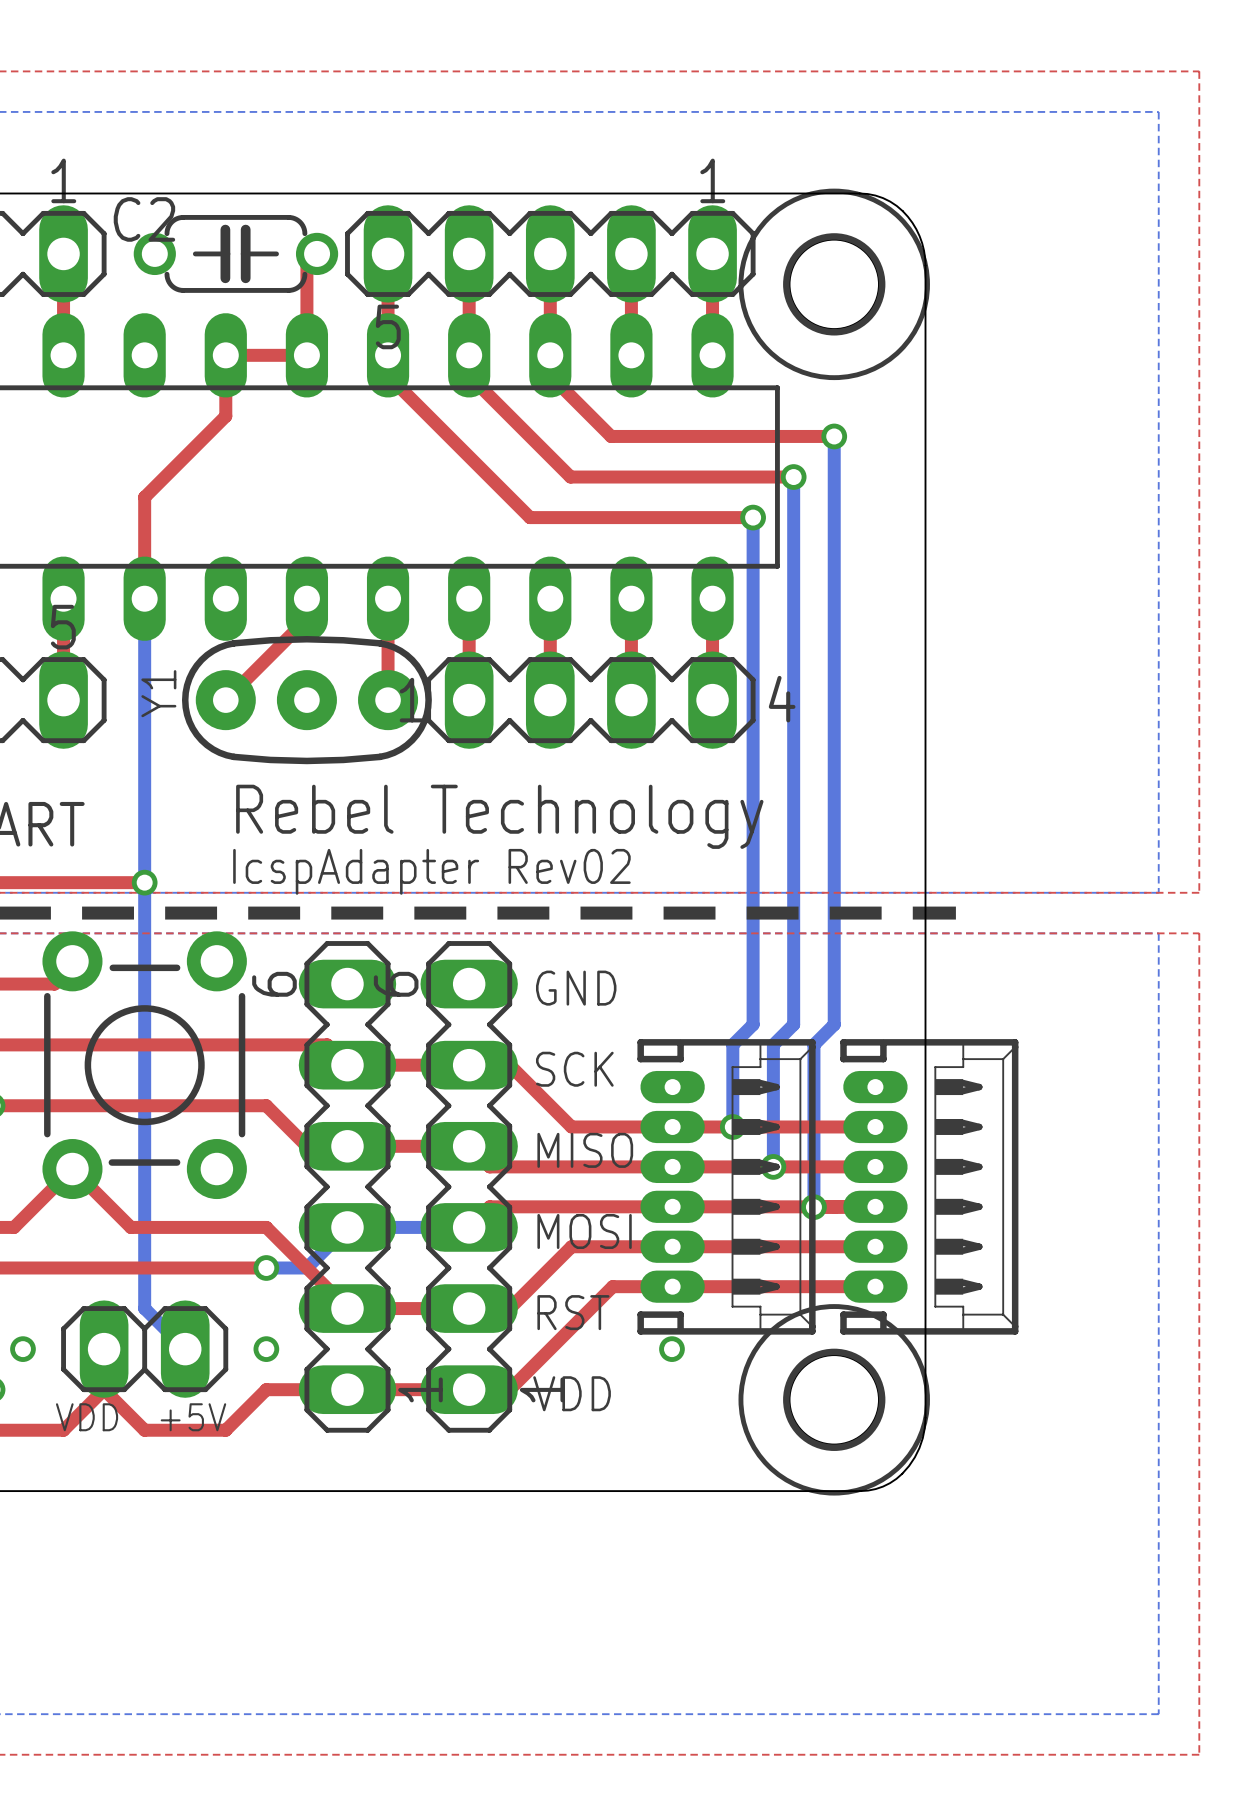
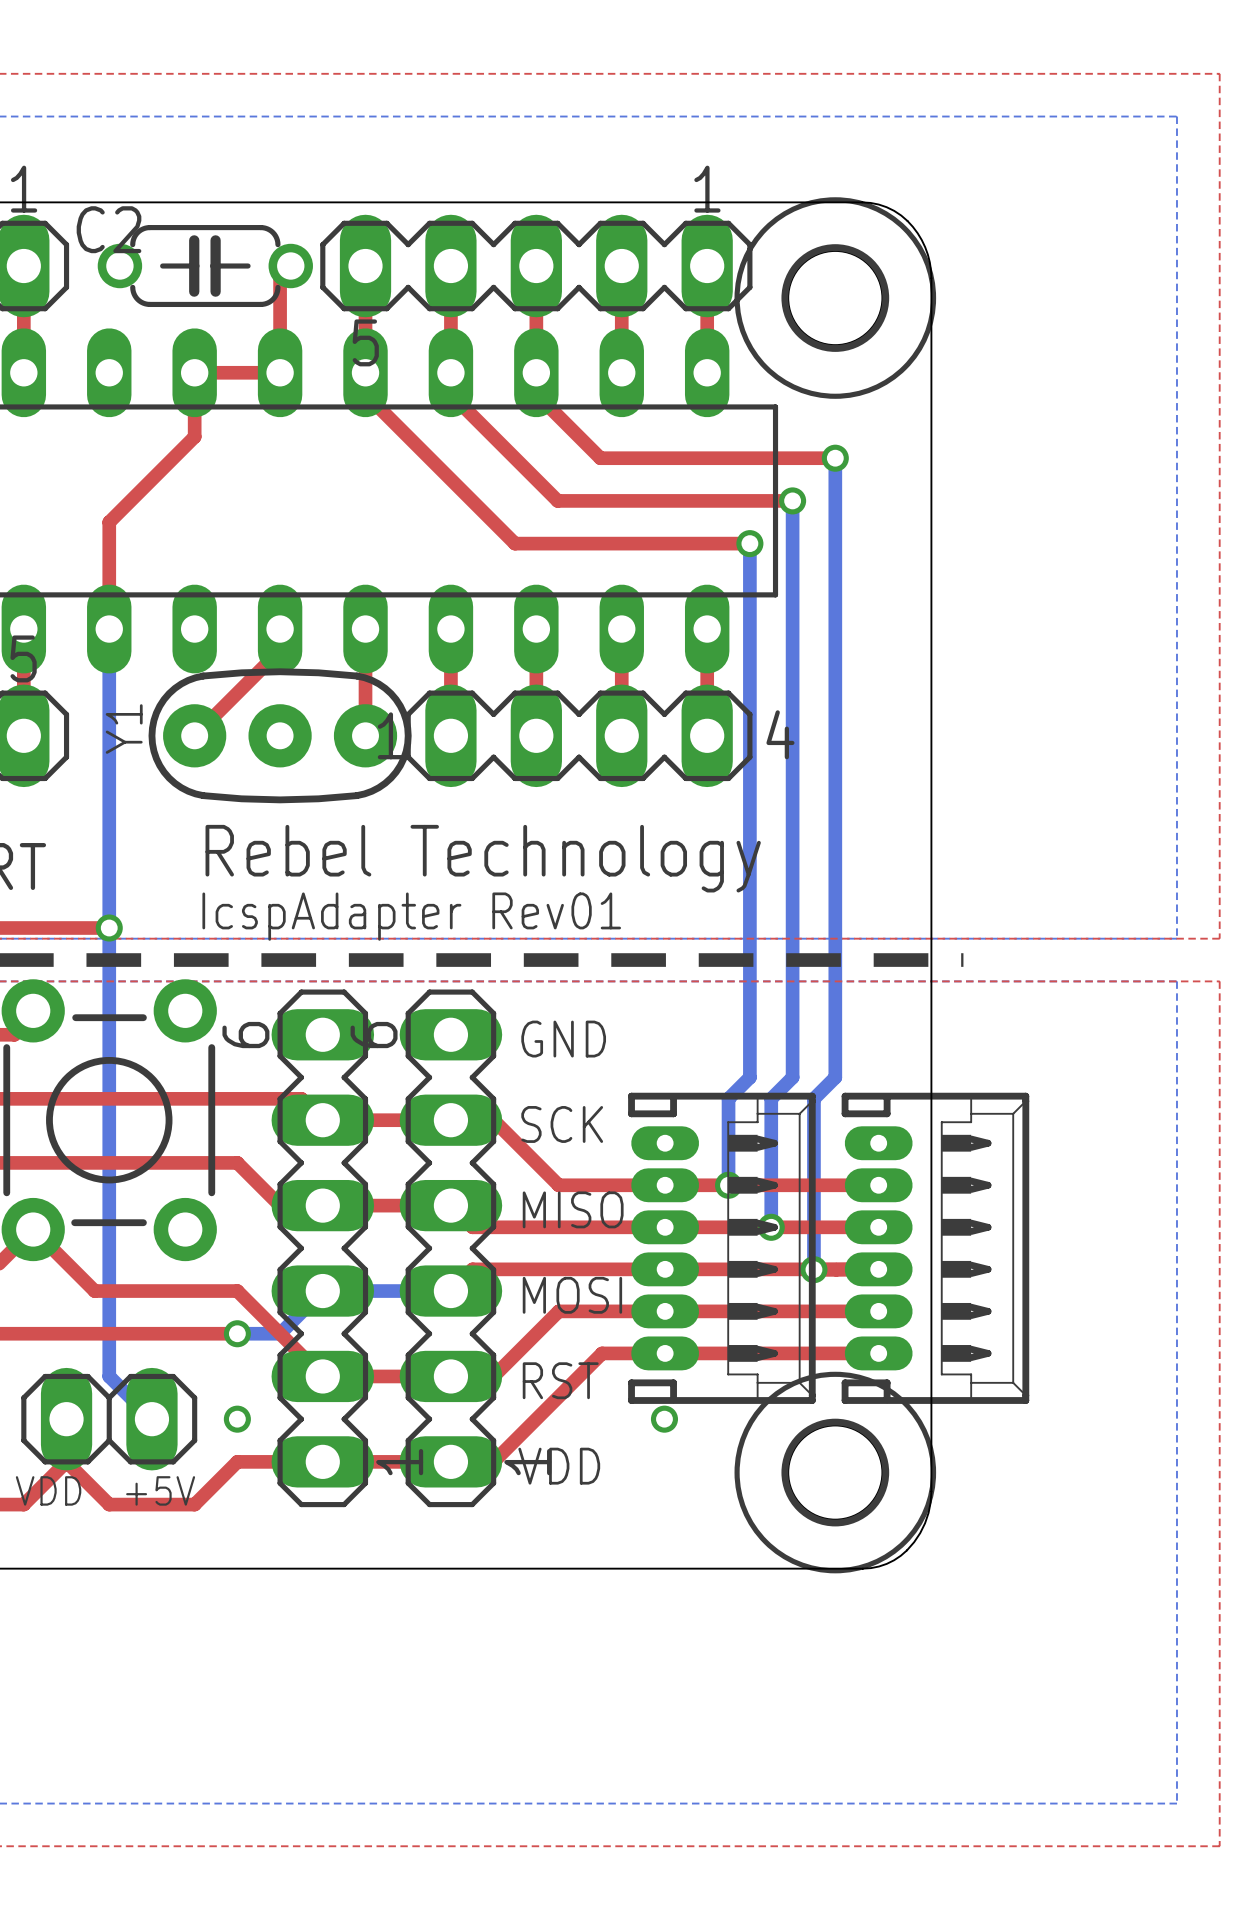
text: IcspAdapter Rev02 (431, 871) -> IcspAdapter Rev01 (411, 916)

